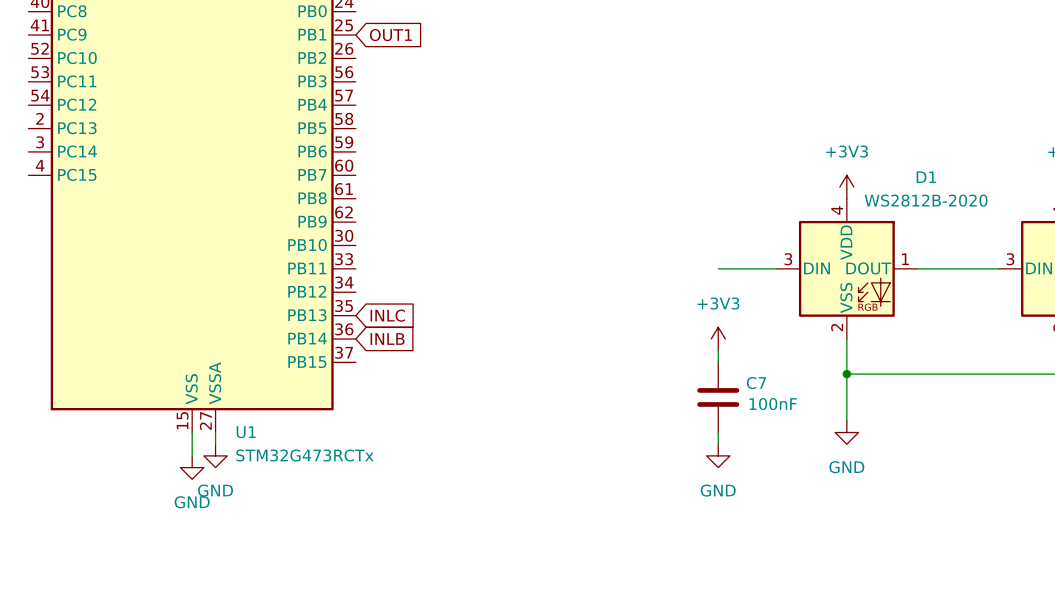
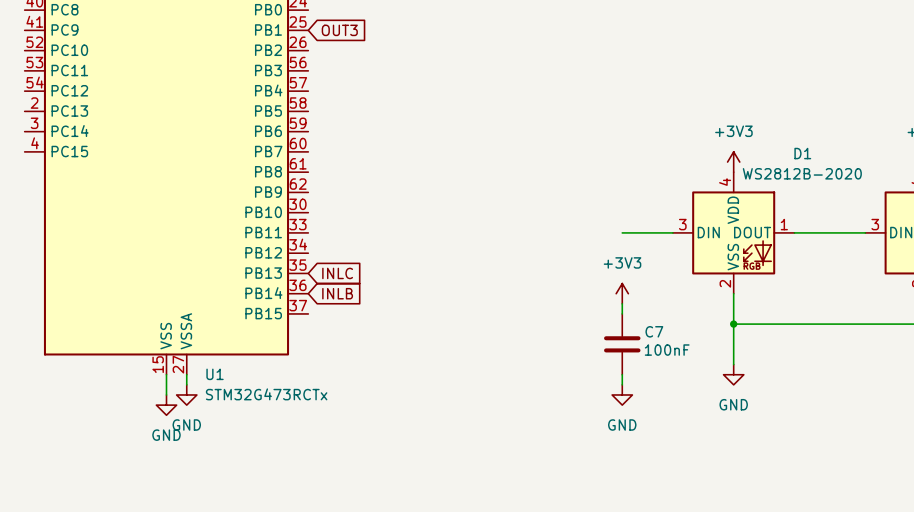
global label: OUT1 (390, 35) -> OUT3 (339, 30)

